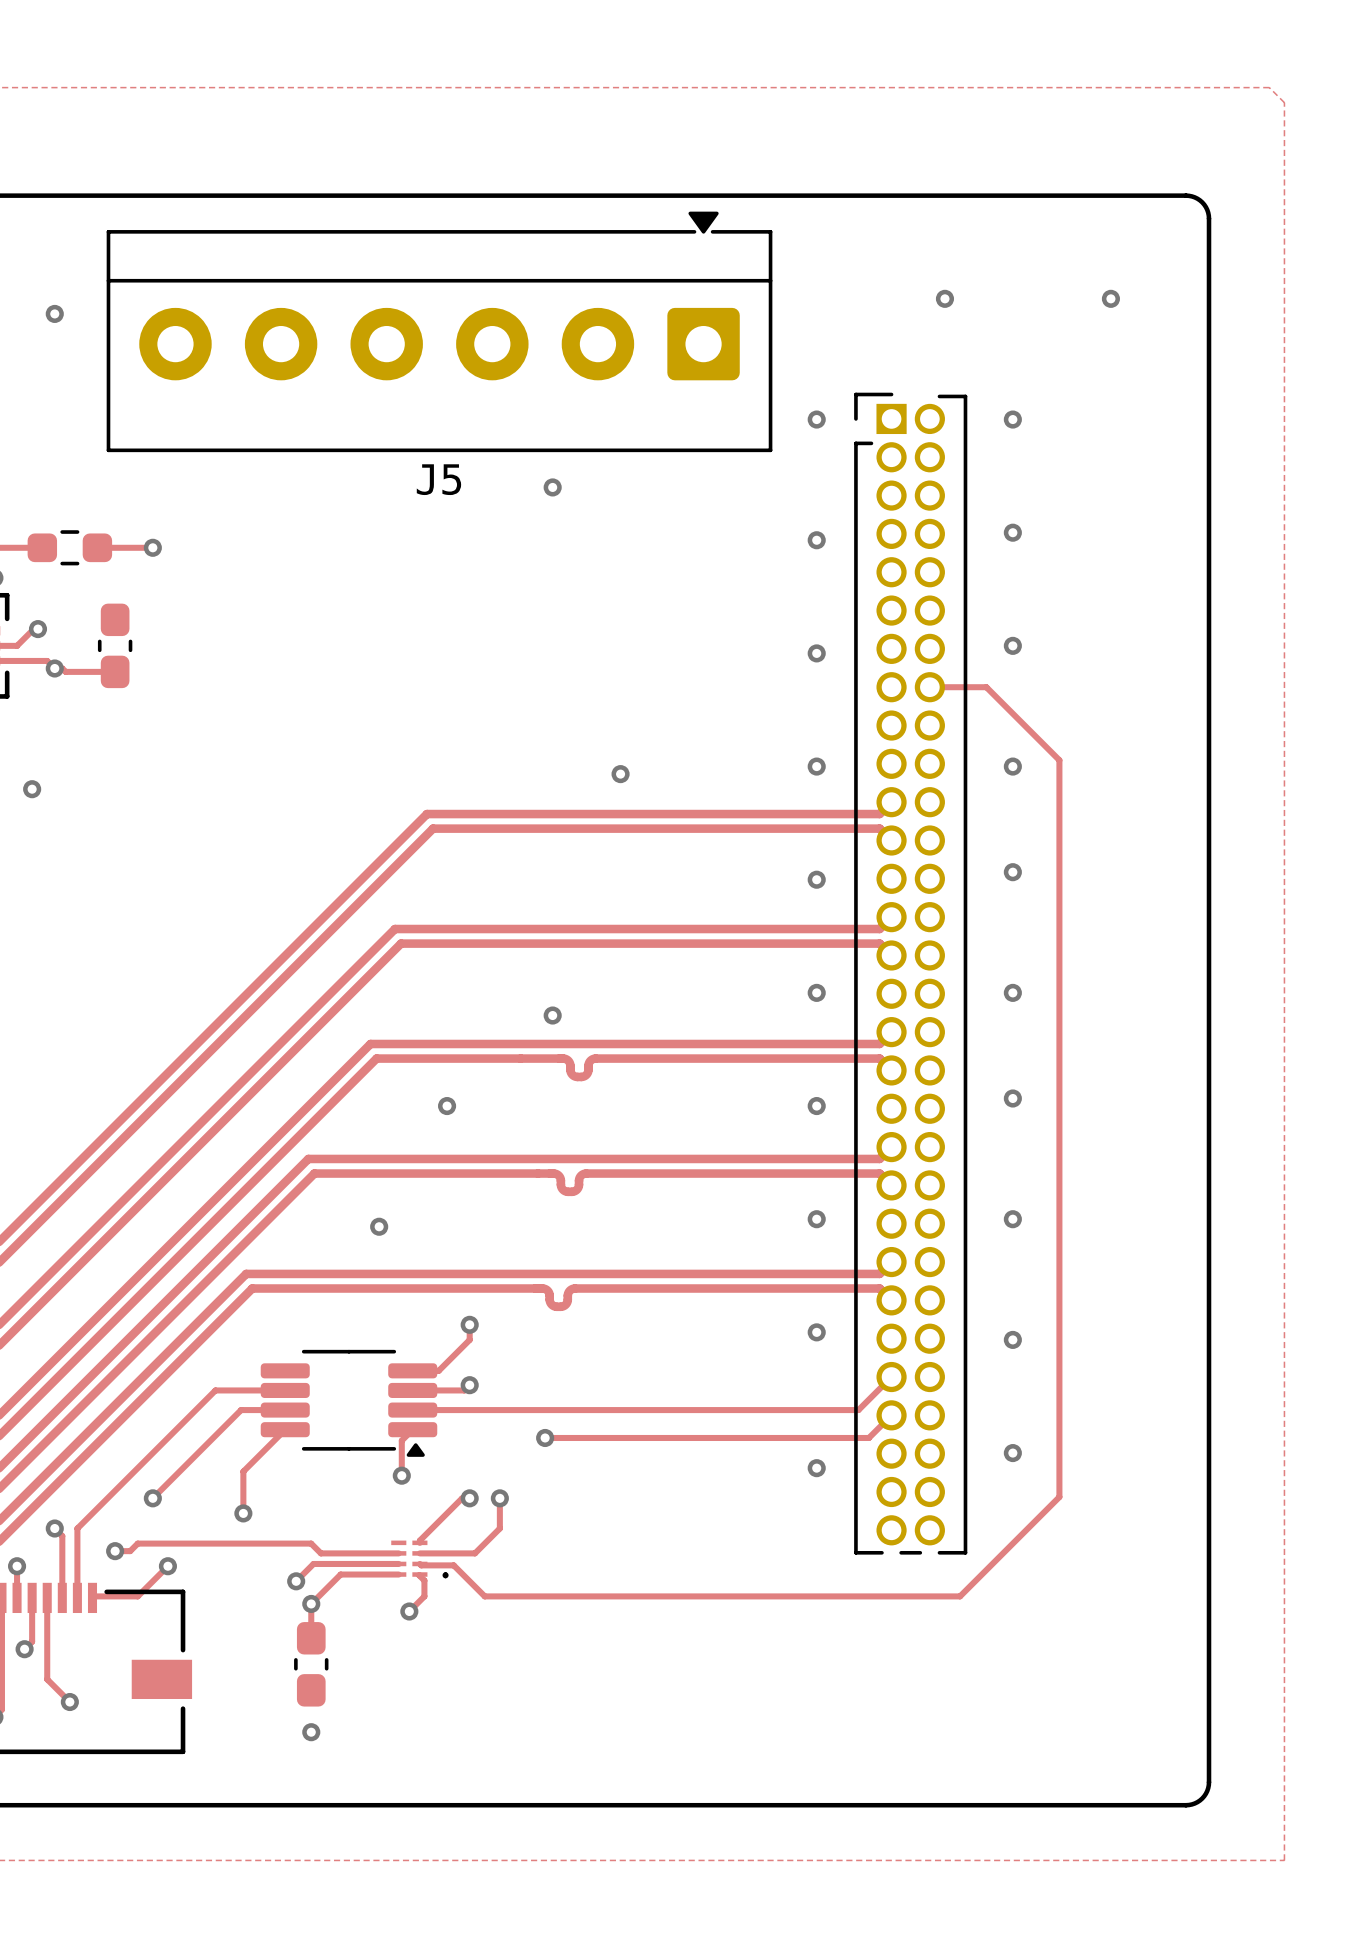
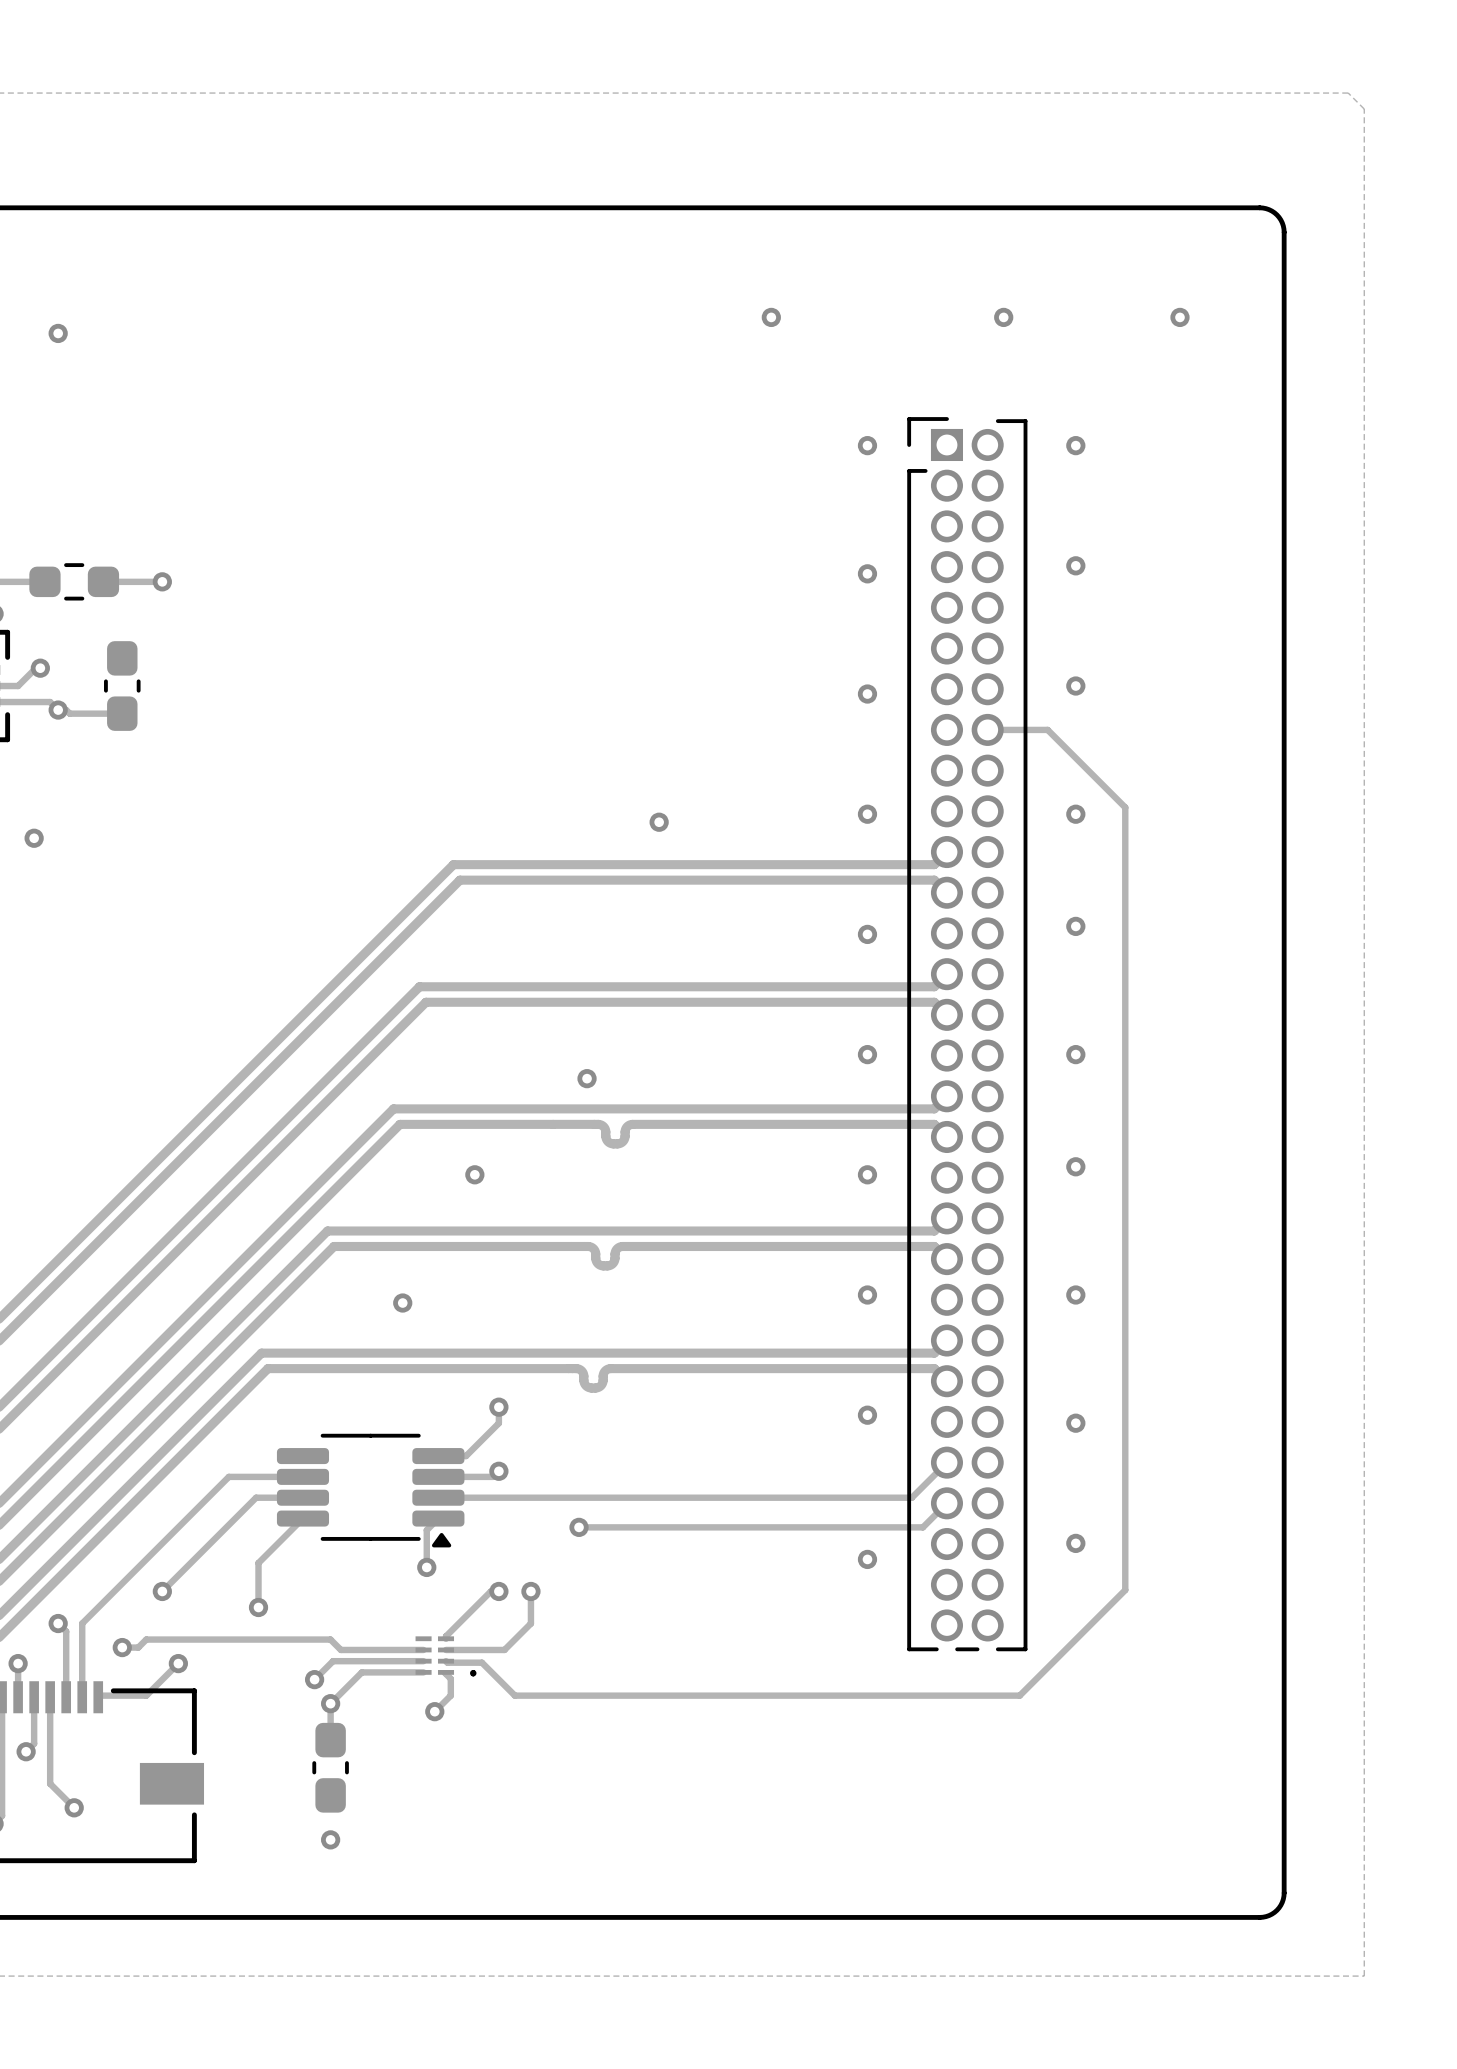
via: none -> (771, 317)
J5: (439, 331) -> none
via: (552, 487) -> none

